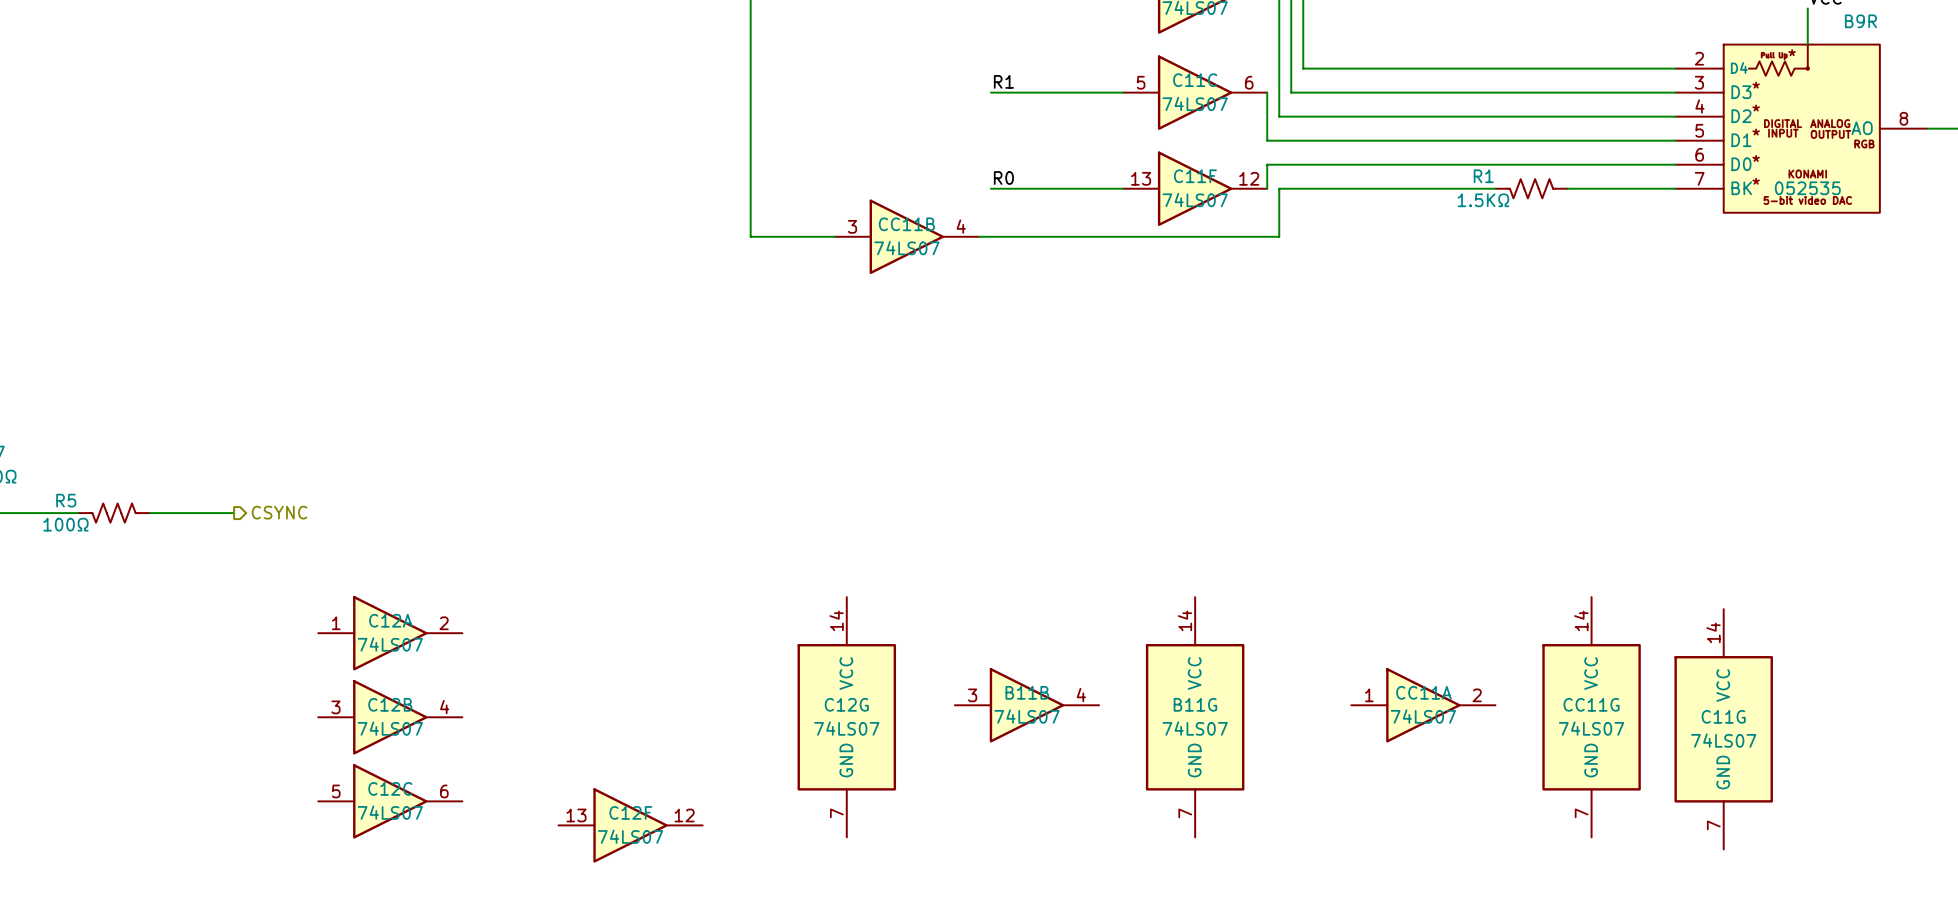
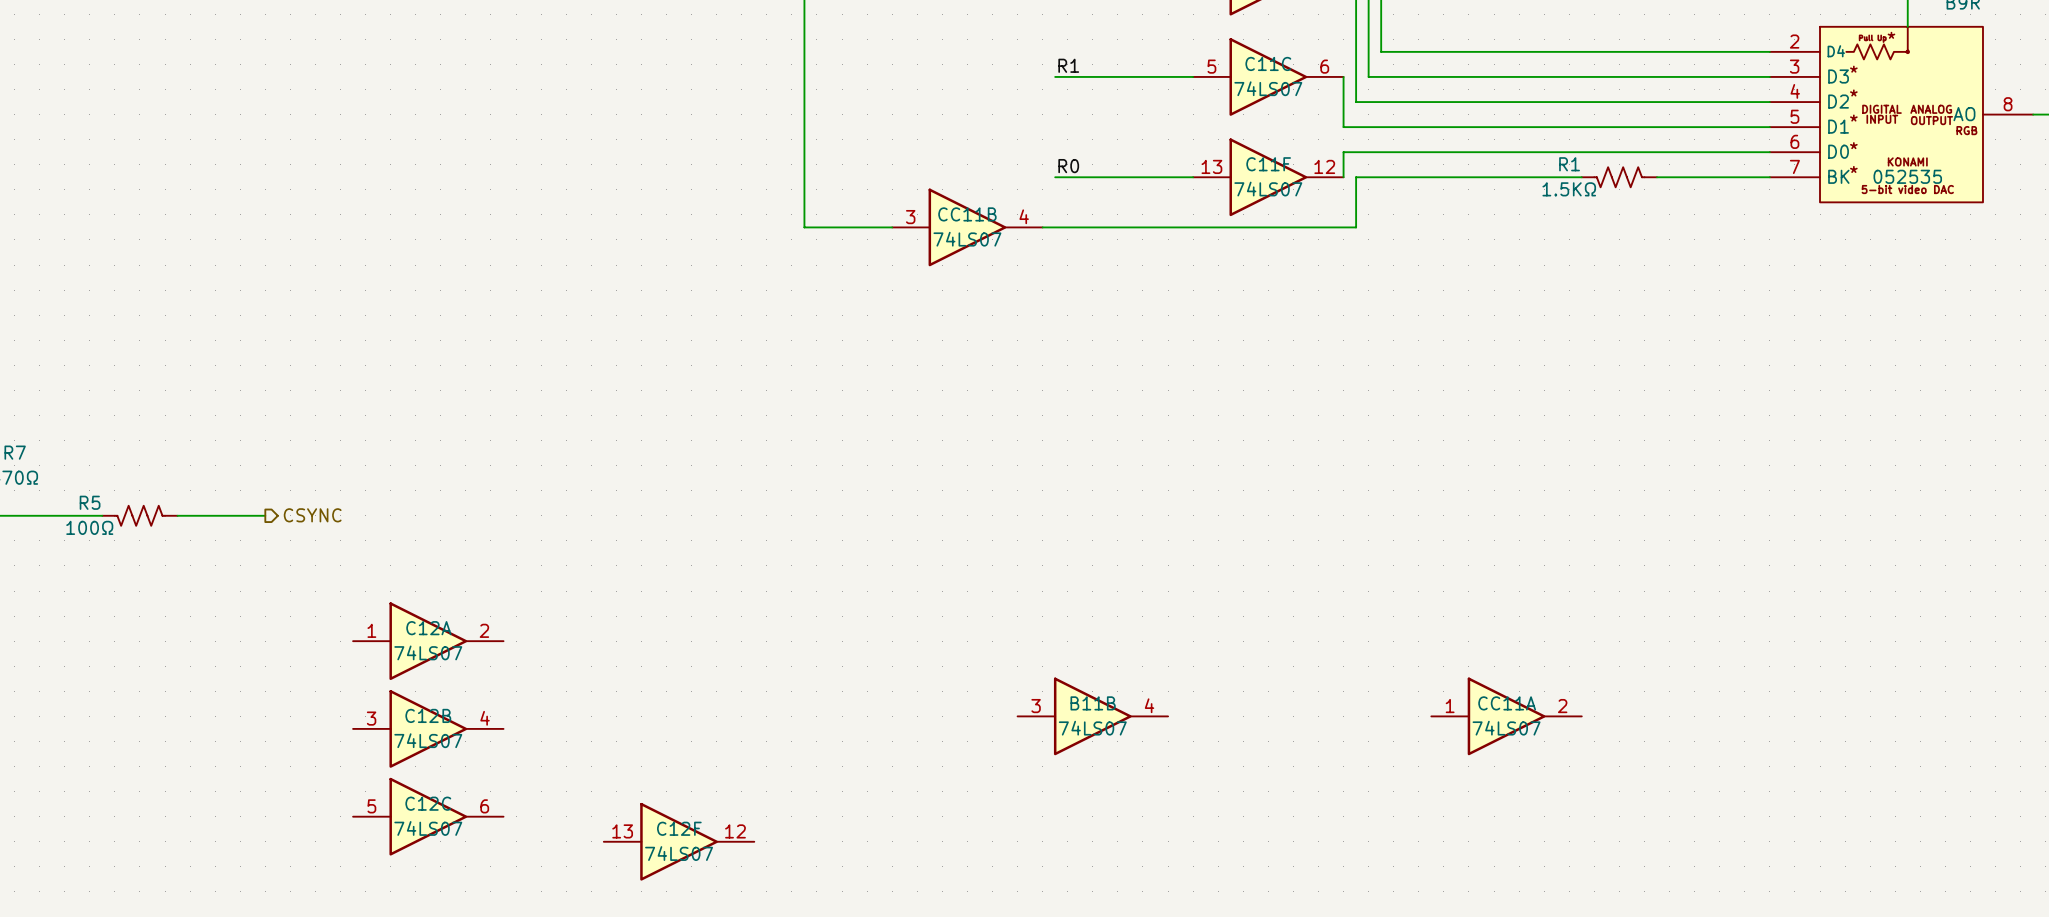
C12G: 74LS07 (846, 717) -> none
B11G: 74LS07 (1195, 717) -> none
CC11G: 74LS07 (1591, 717) -> none
C11G: 74LS07 (1723, 729) -> none

